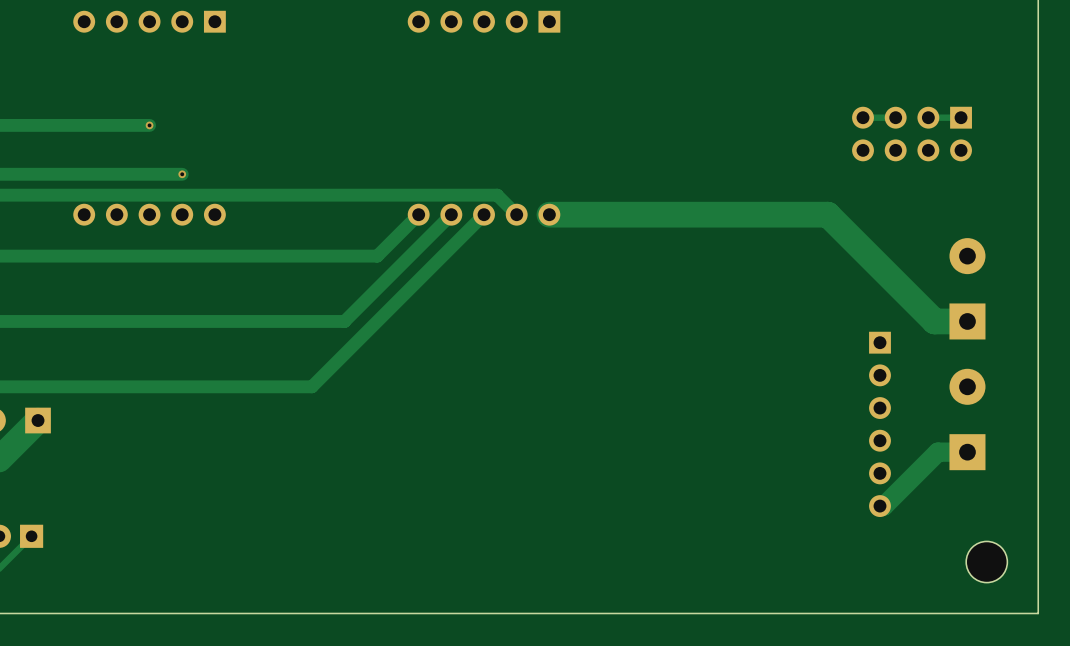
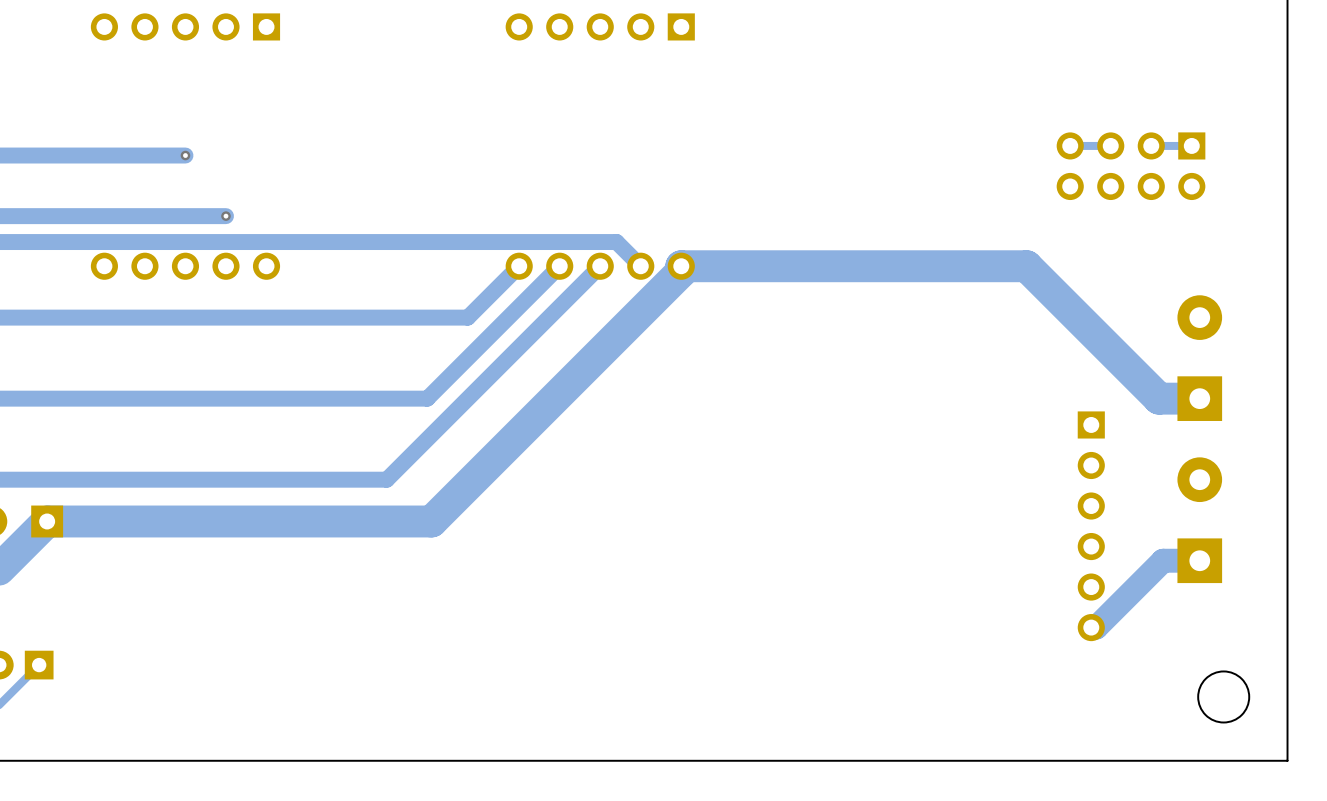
track: none -> (681, 266) (681, 271) (431, 521) (47, 521)

